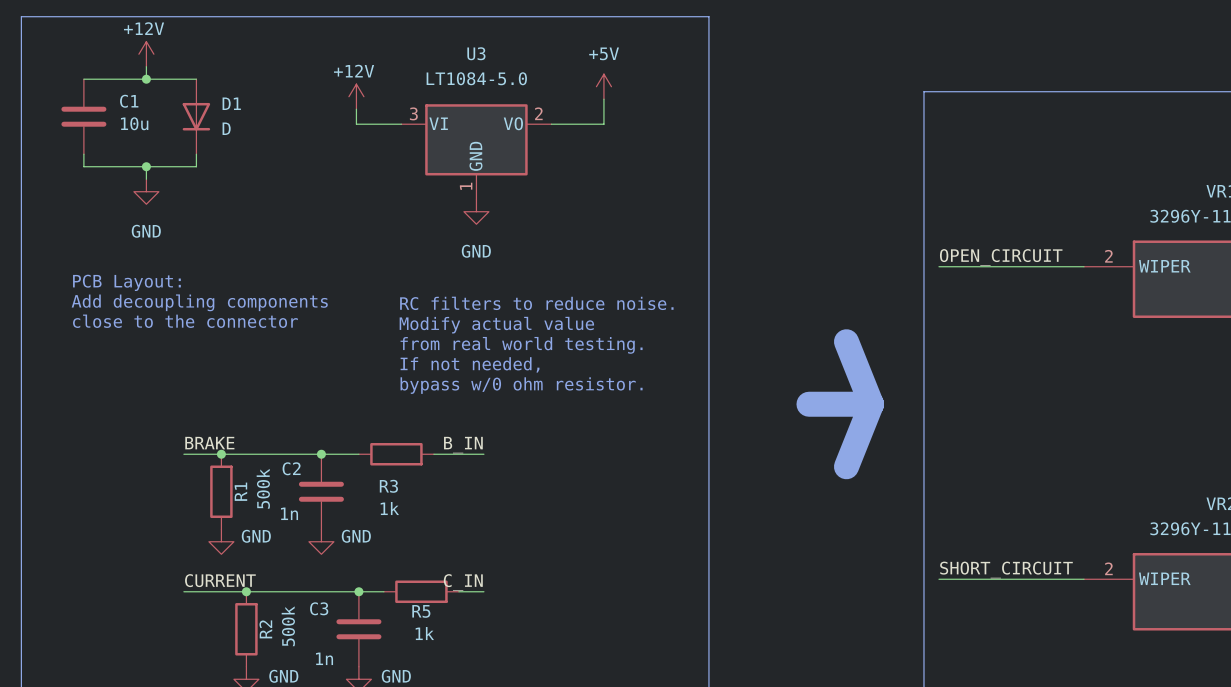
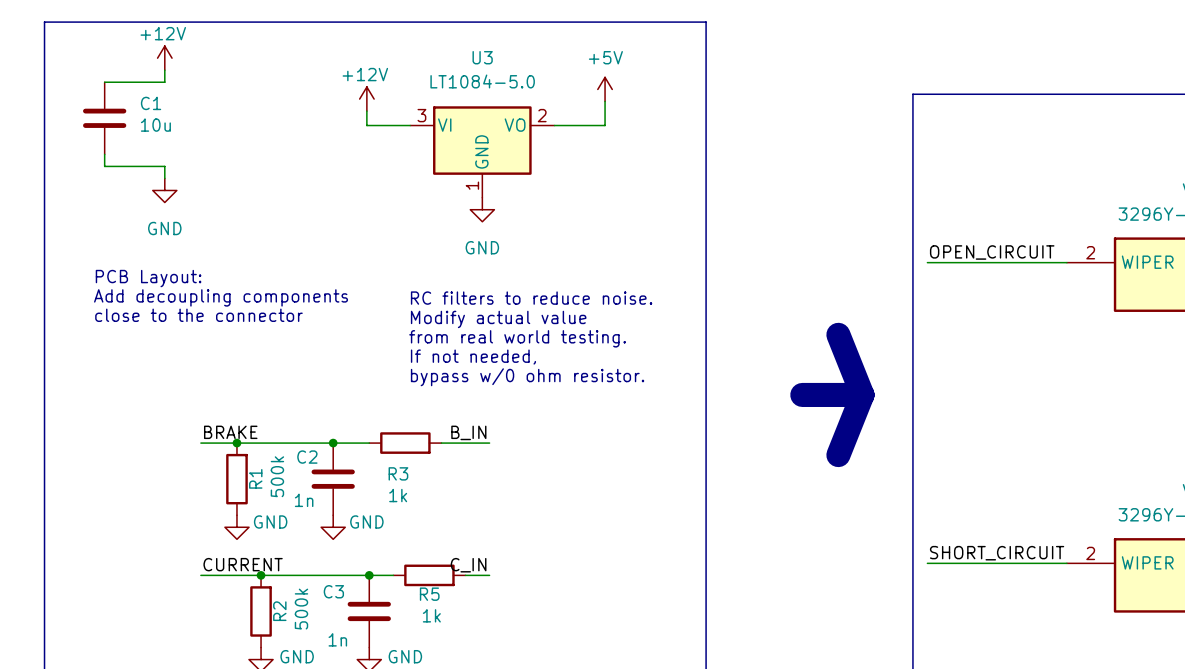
wire: (146, 79) (196, 79) -> none
junction: (146, 79) -> none
D1: D (196, 116) -> none
wire: (196, 154) (196, 166) (146, 166) -> none
junction: (146, 166) -> none

